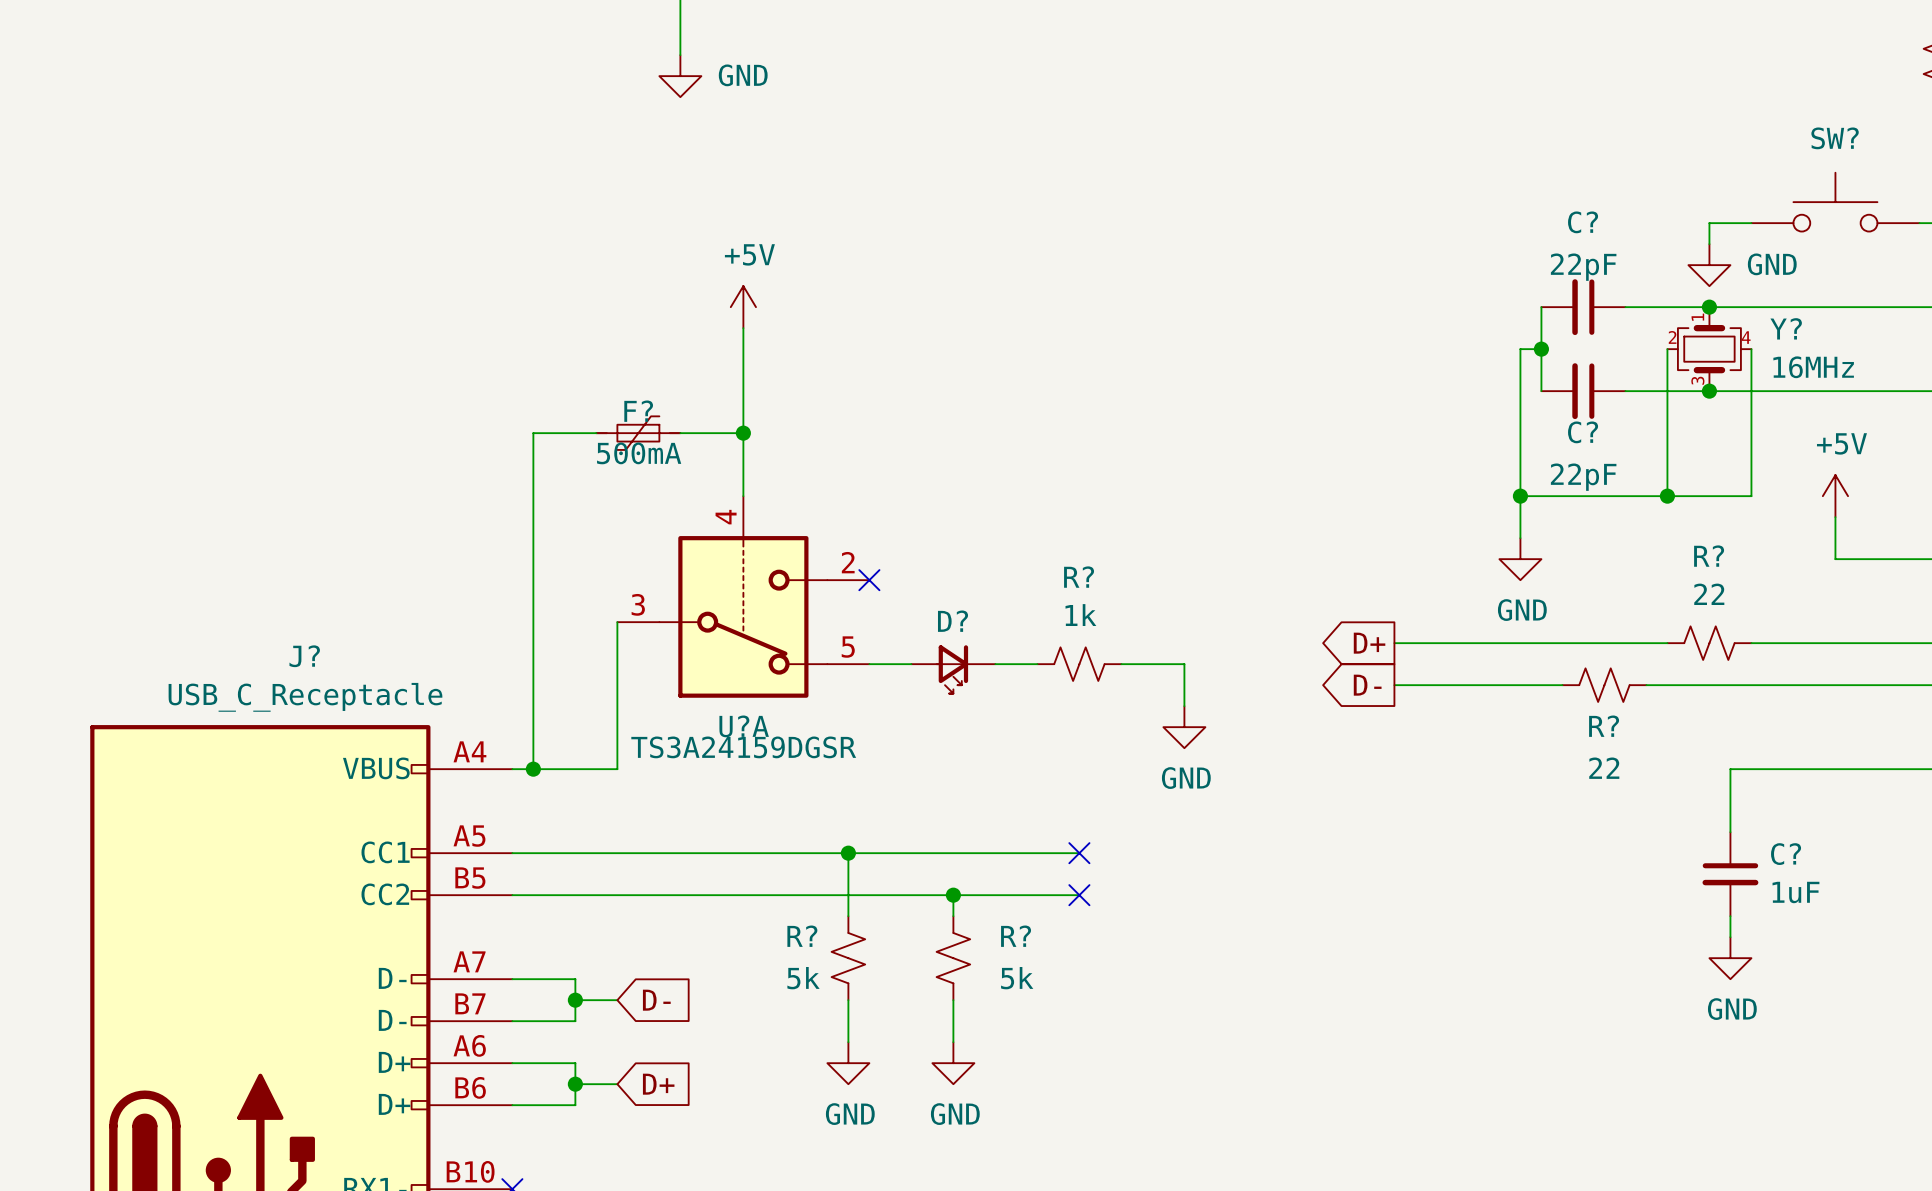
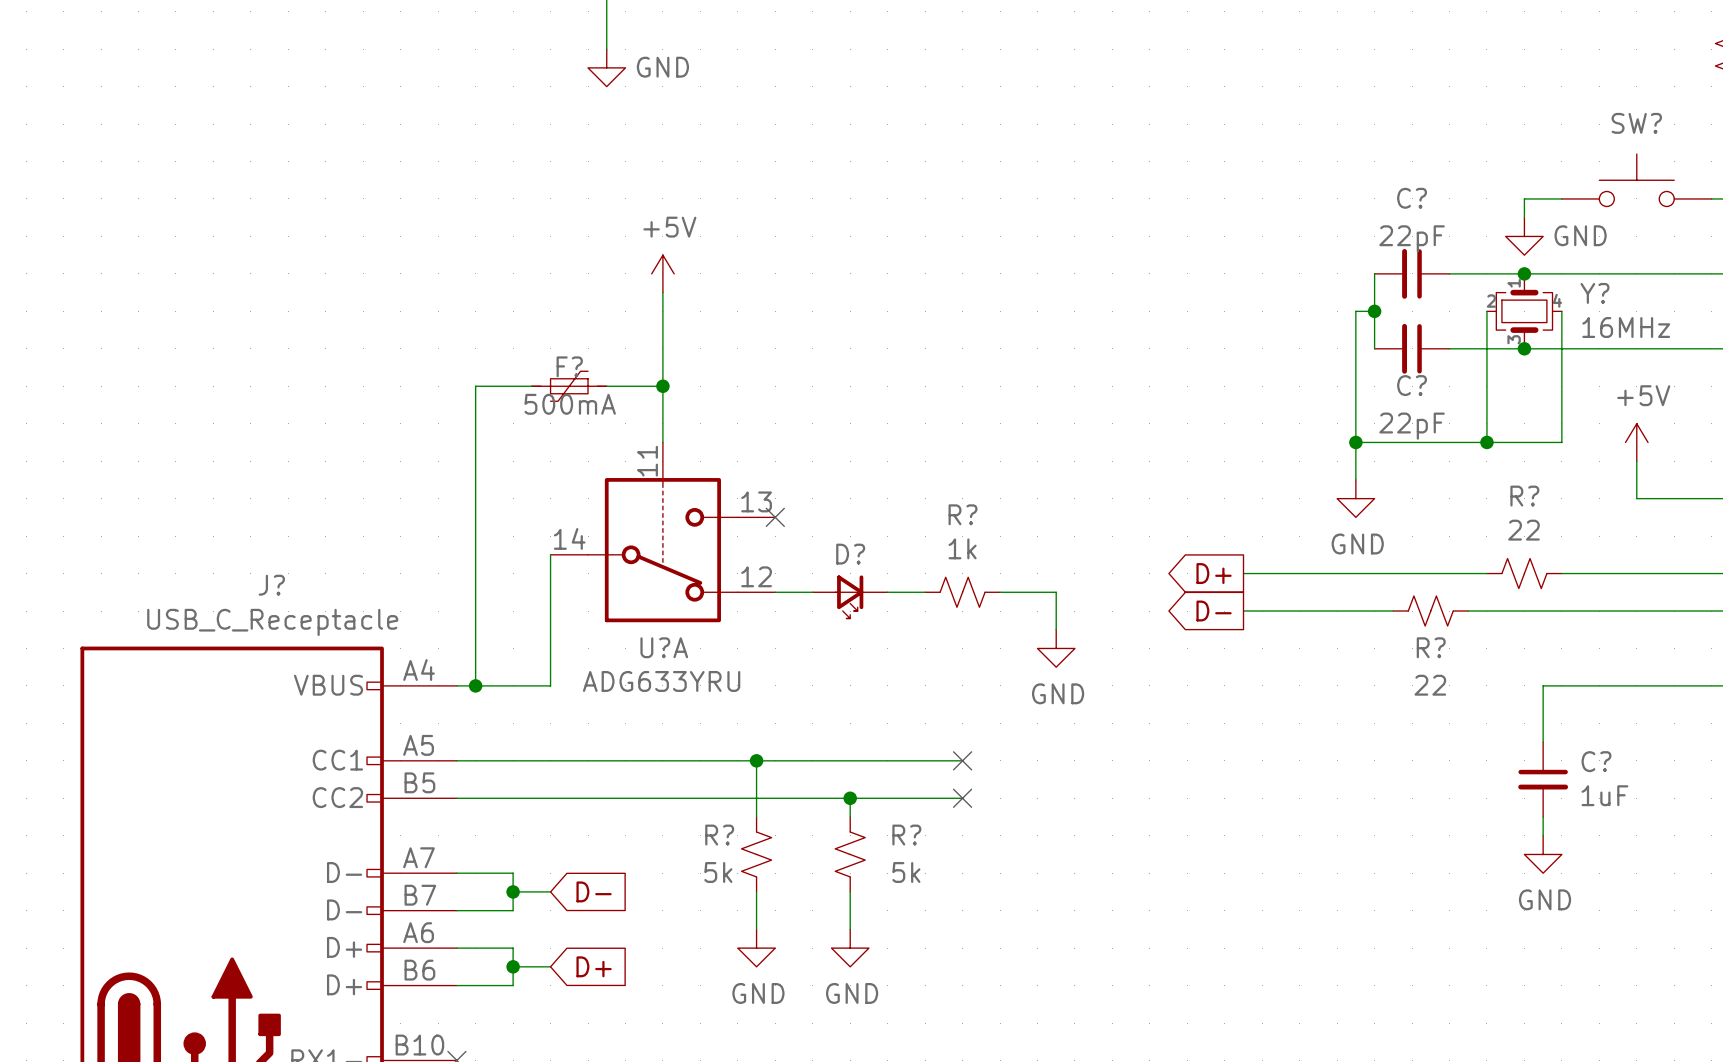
U?A pin number: 4 (726, 517) -> 11 (647, 461)
U?A pin number: 2 (848, 562) -> 13 (756, 501)
U?A pin number: 3 (638, 604) -> 14 (569, 538)
U?A pin number: 5 (848, 647) -> 12 (756, 576)
U?A value: TS3A24159DGSR (743, 747) -> ADG633YRU (661, 681)

